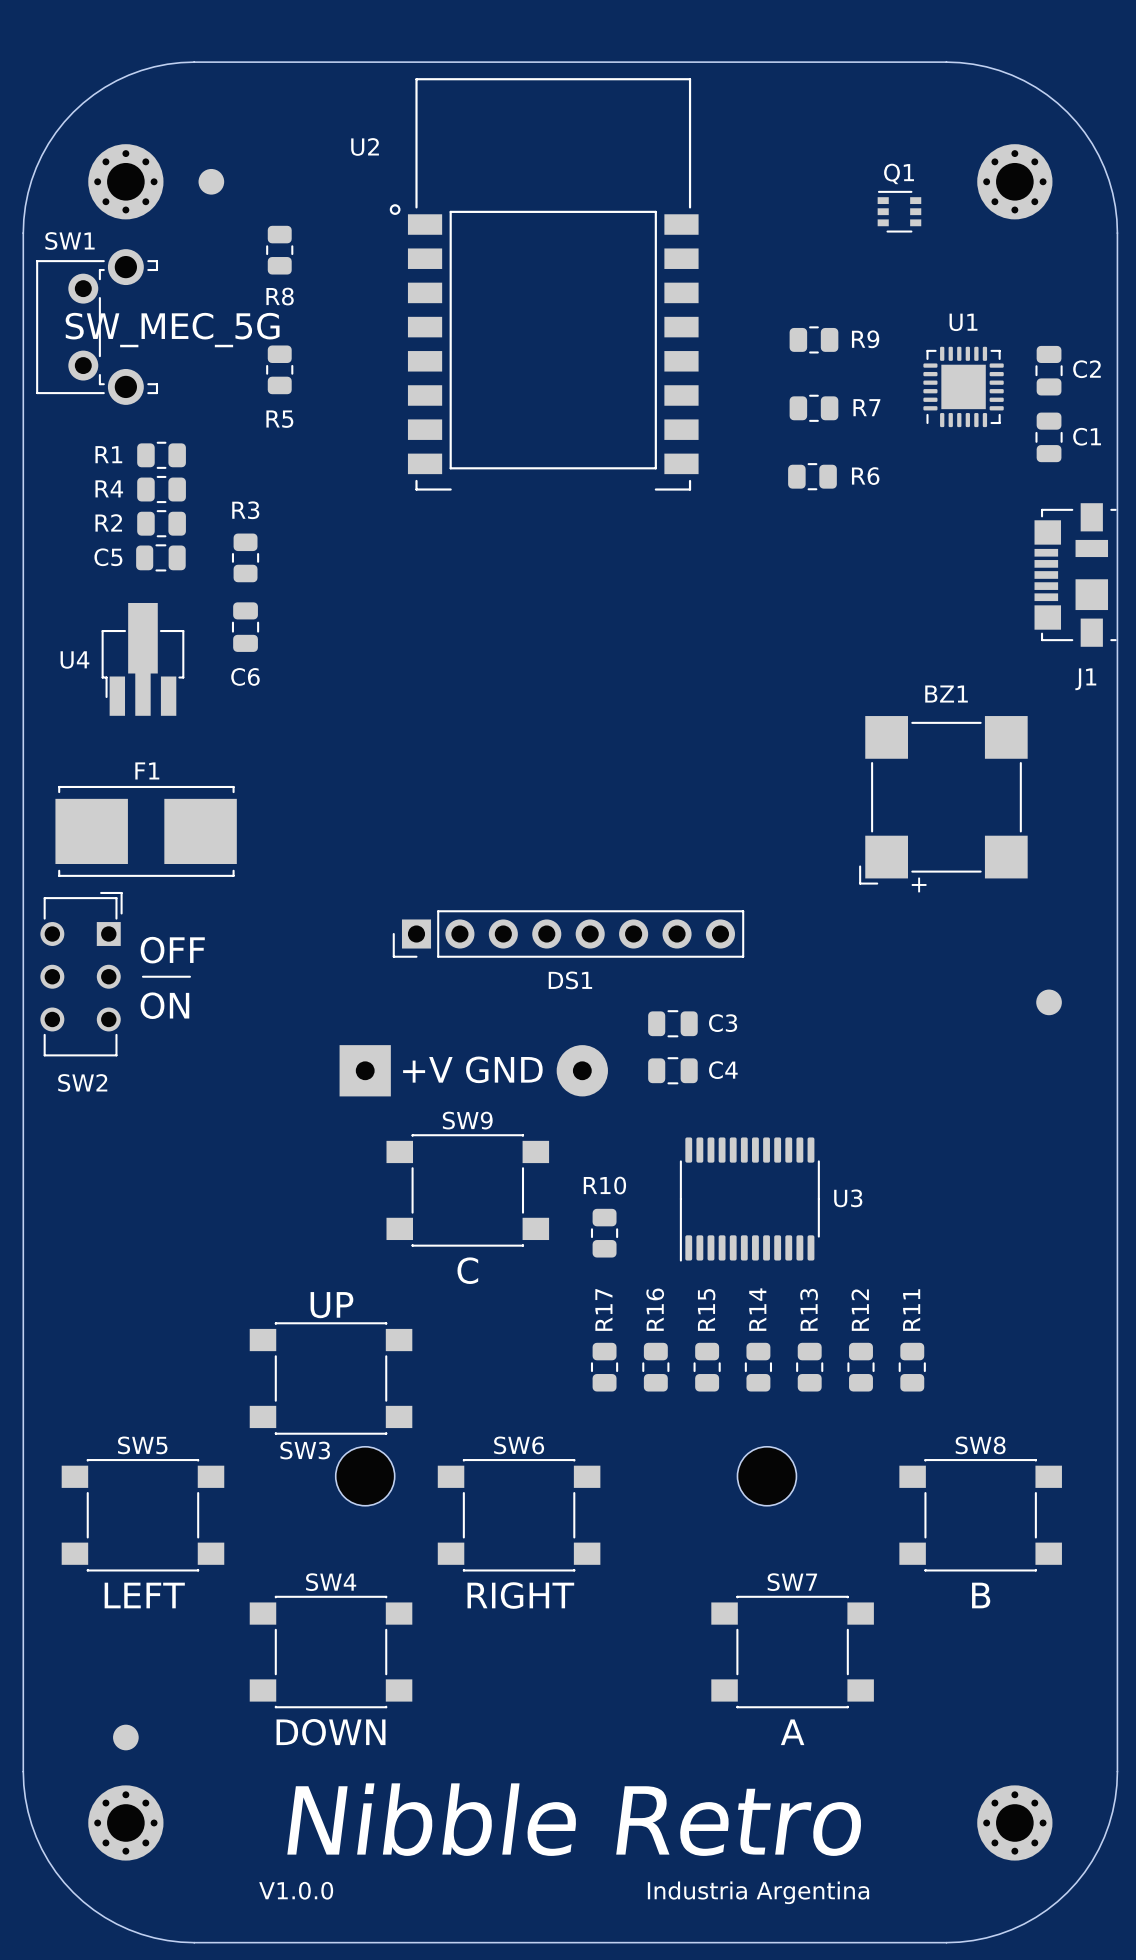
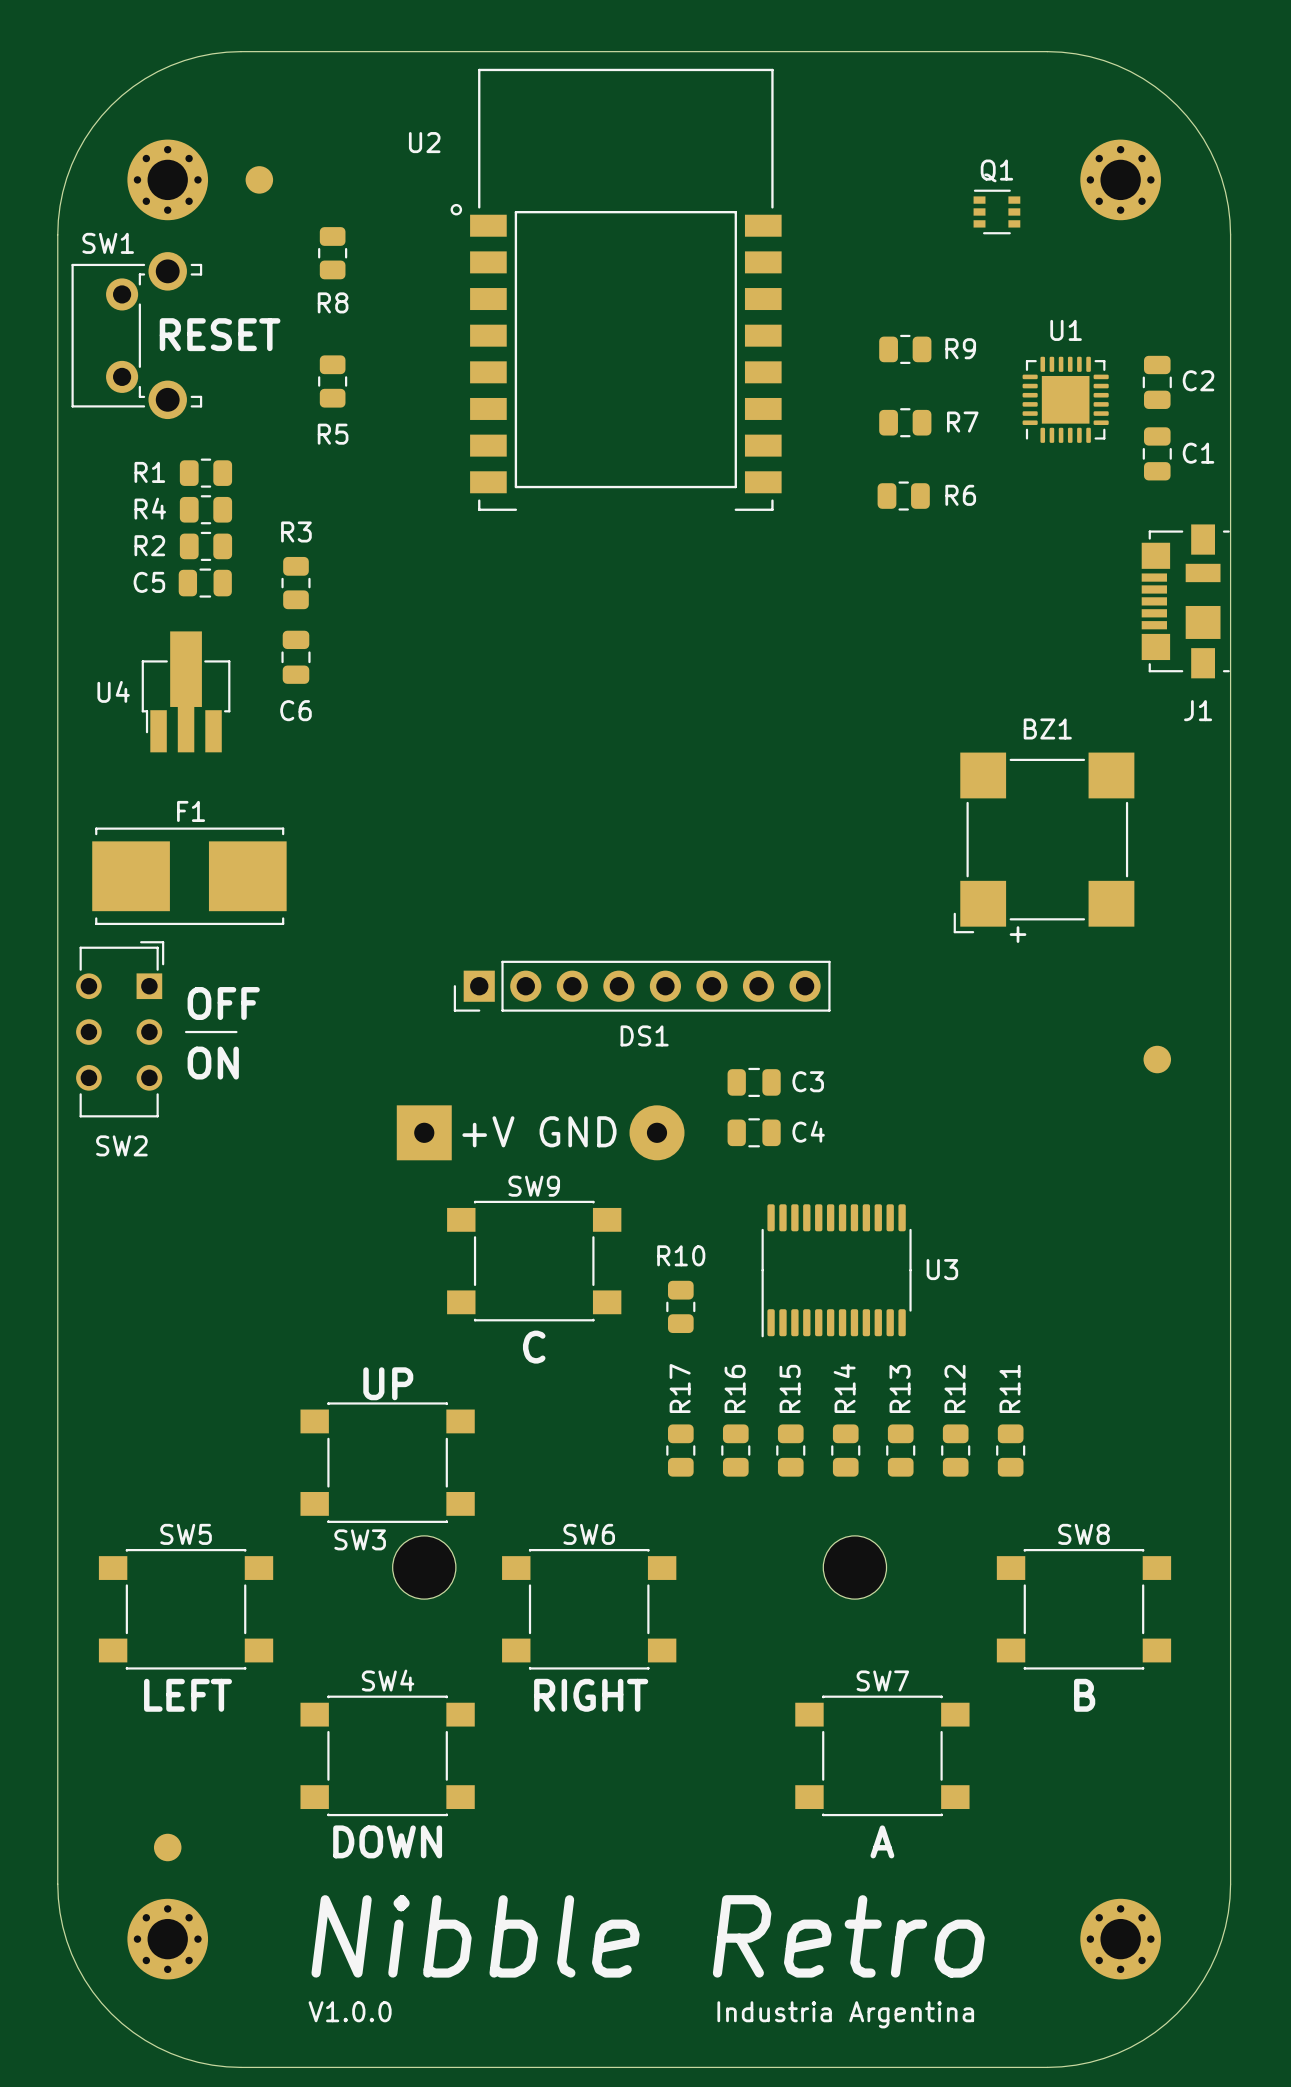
SW1 value: SW_MEC_5G (172, 330) -> RESET (220, 334)

